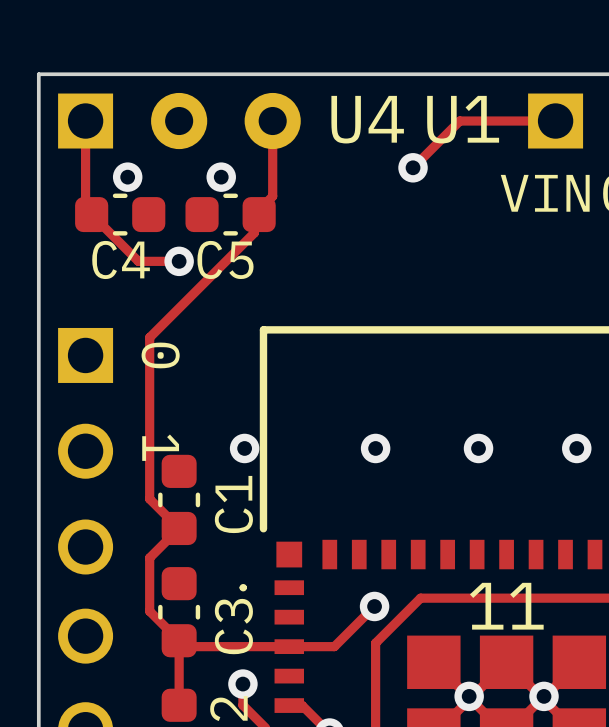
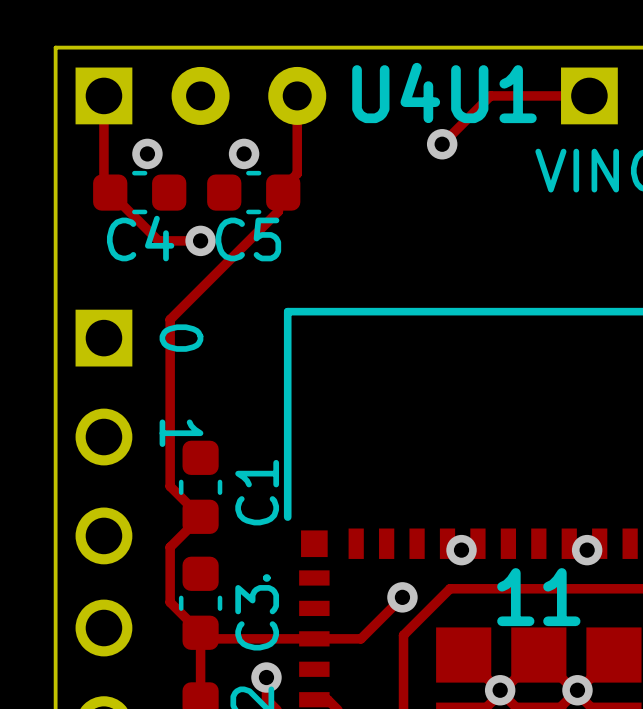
via: (244, 448) -> none
via: (375, 448) -> none
via: (478, 448) -> none
via: (576, 448) -> none
via: none -> (461, 550)
via: none -> (587, 550)

